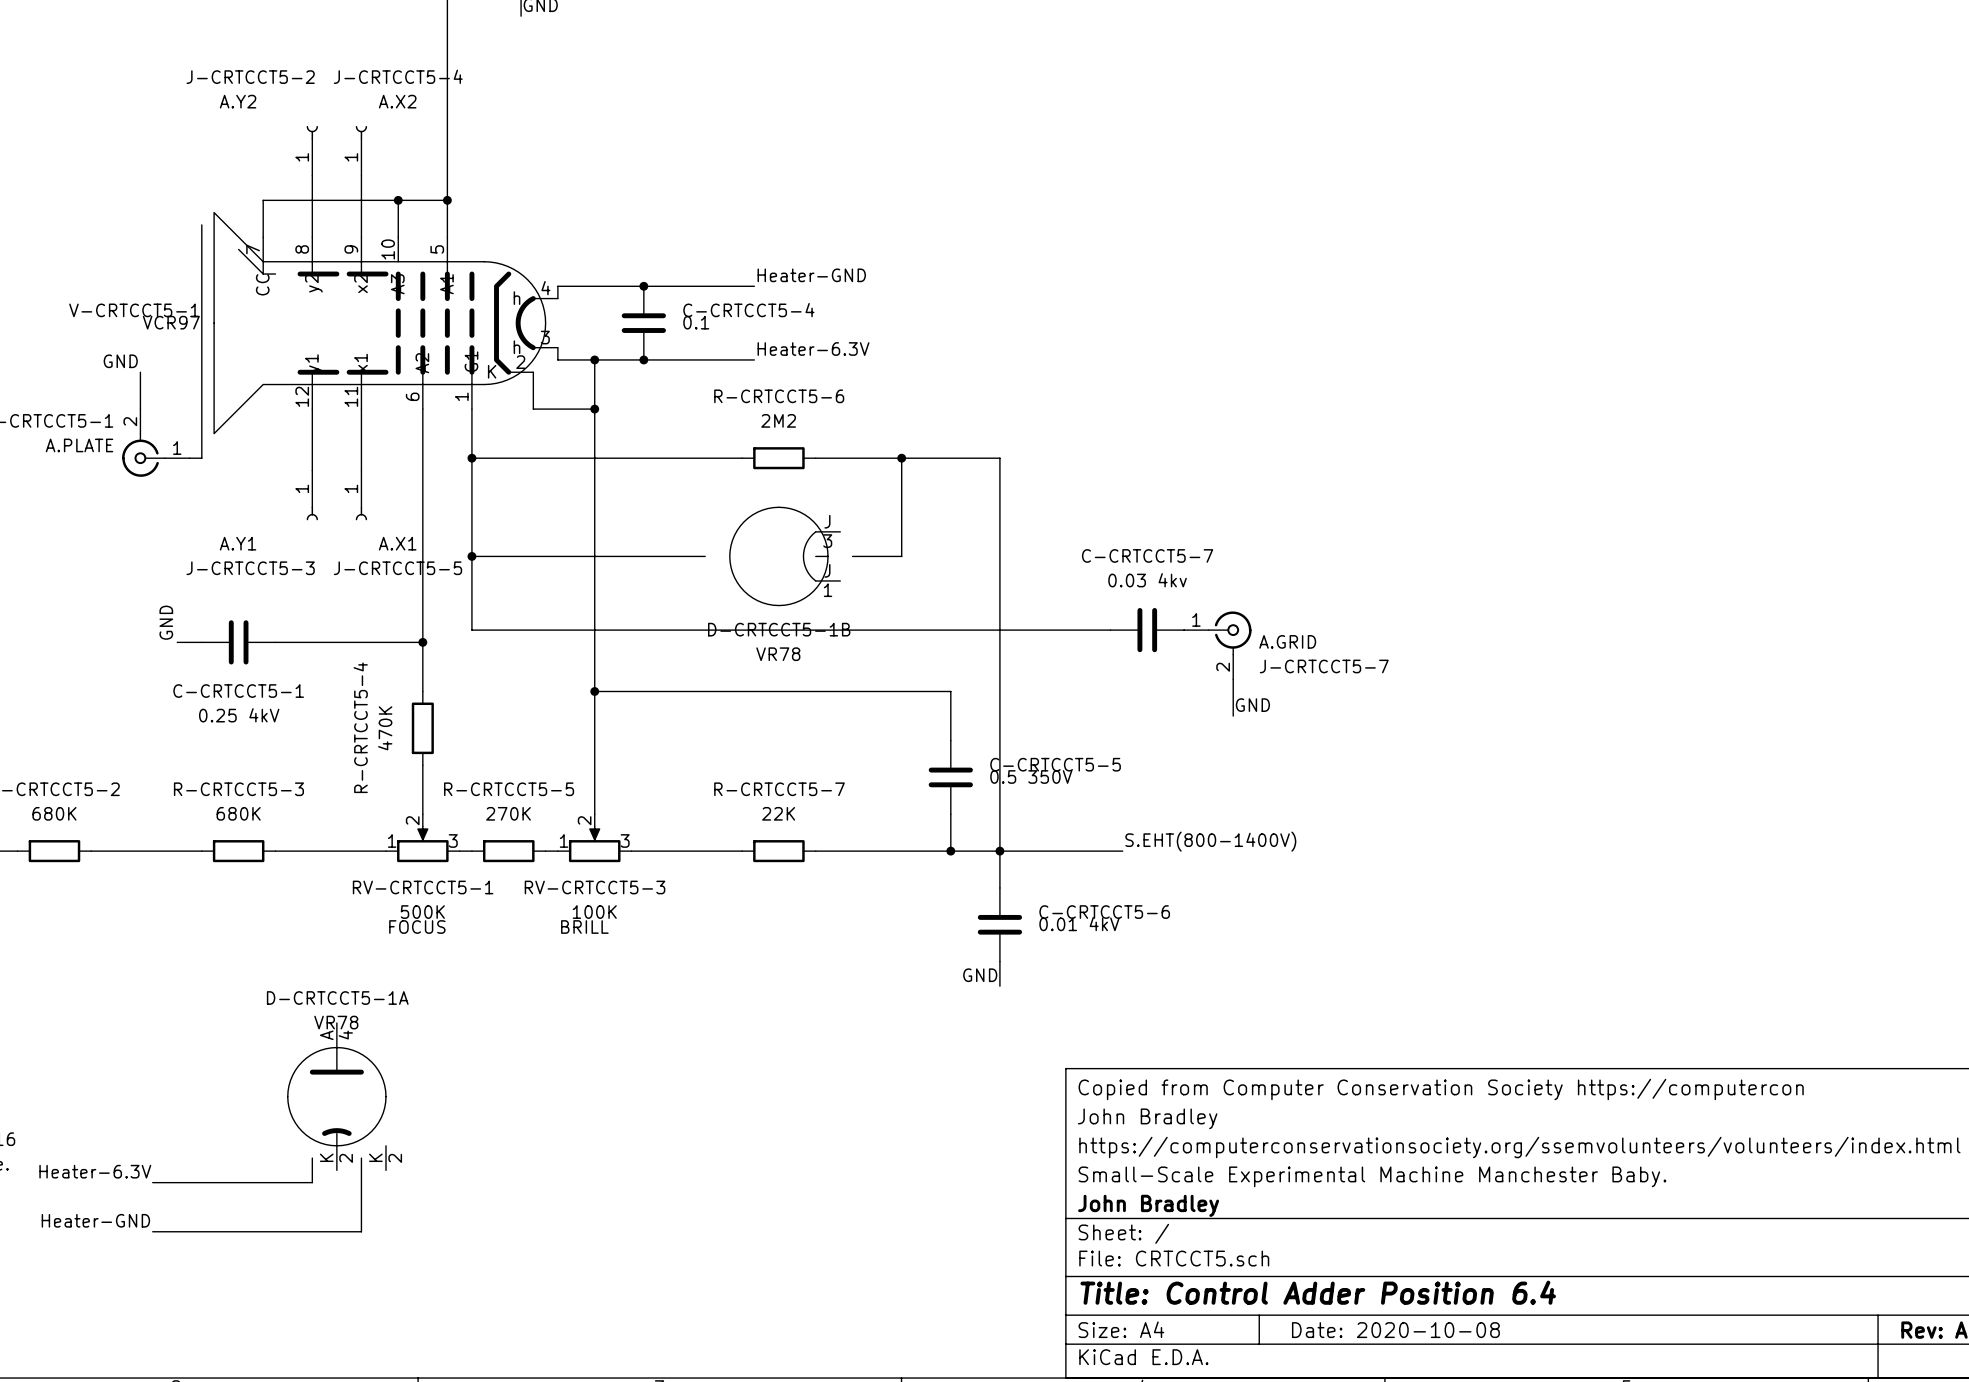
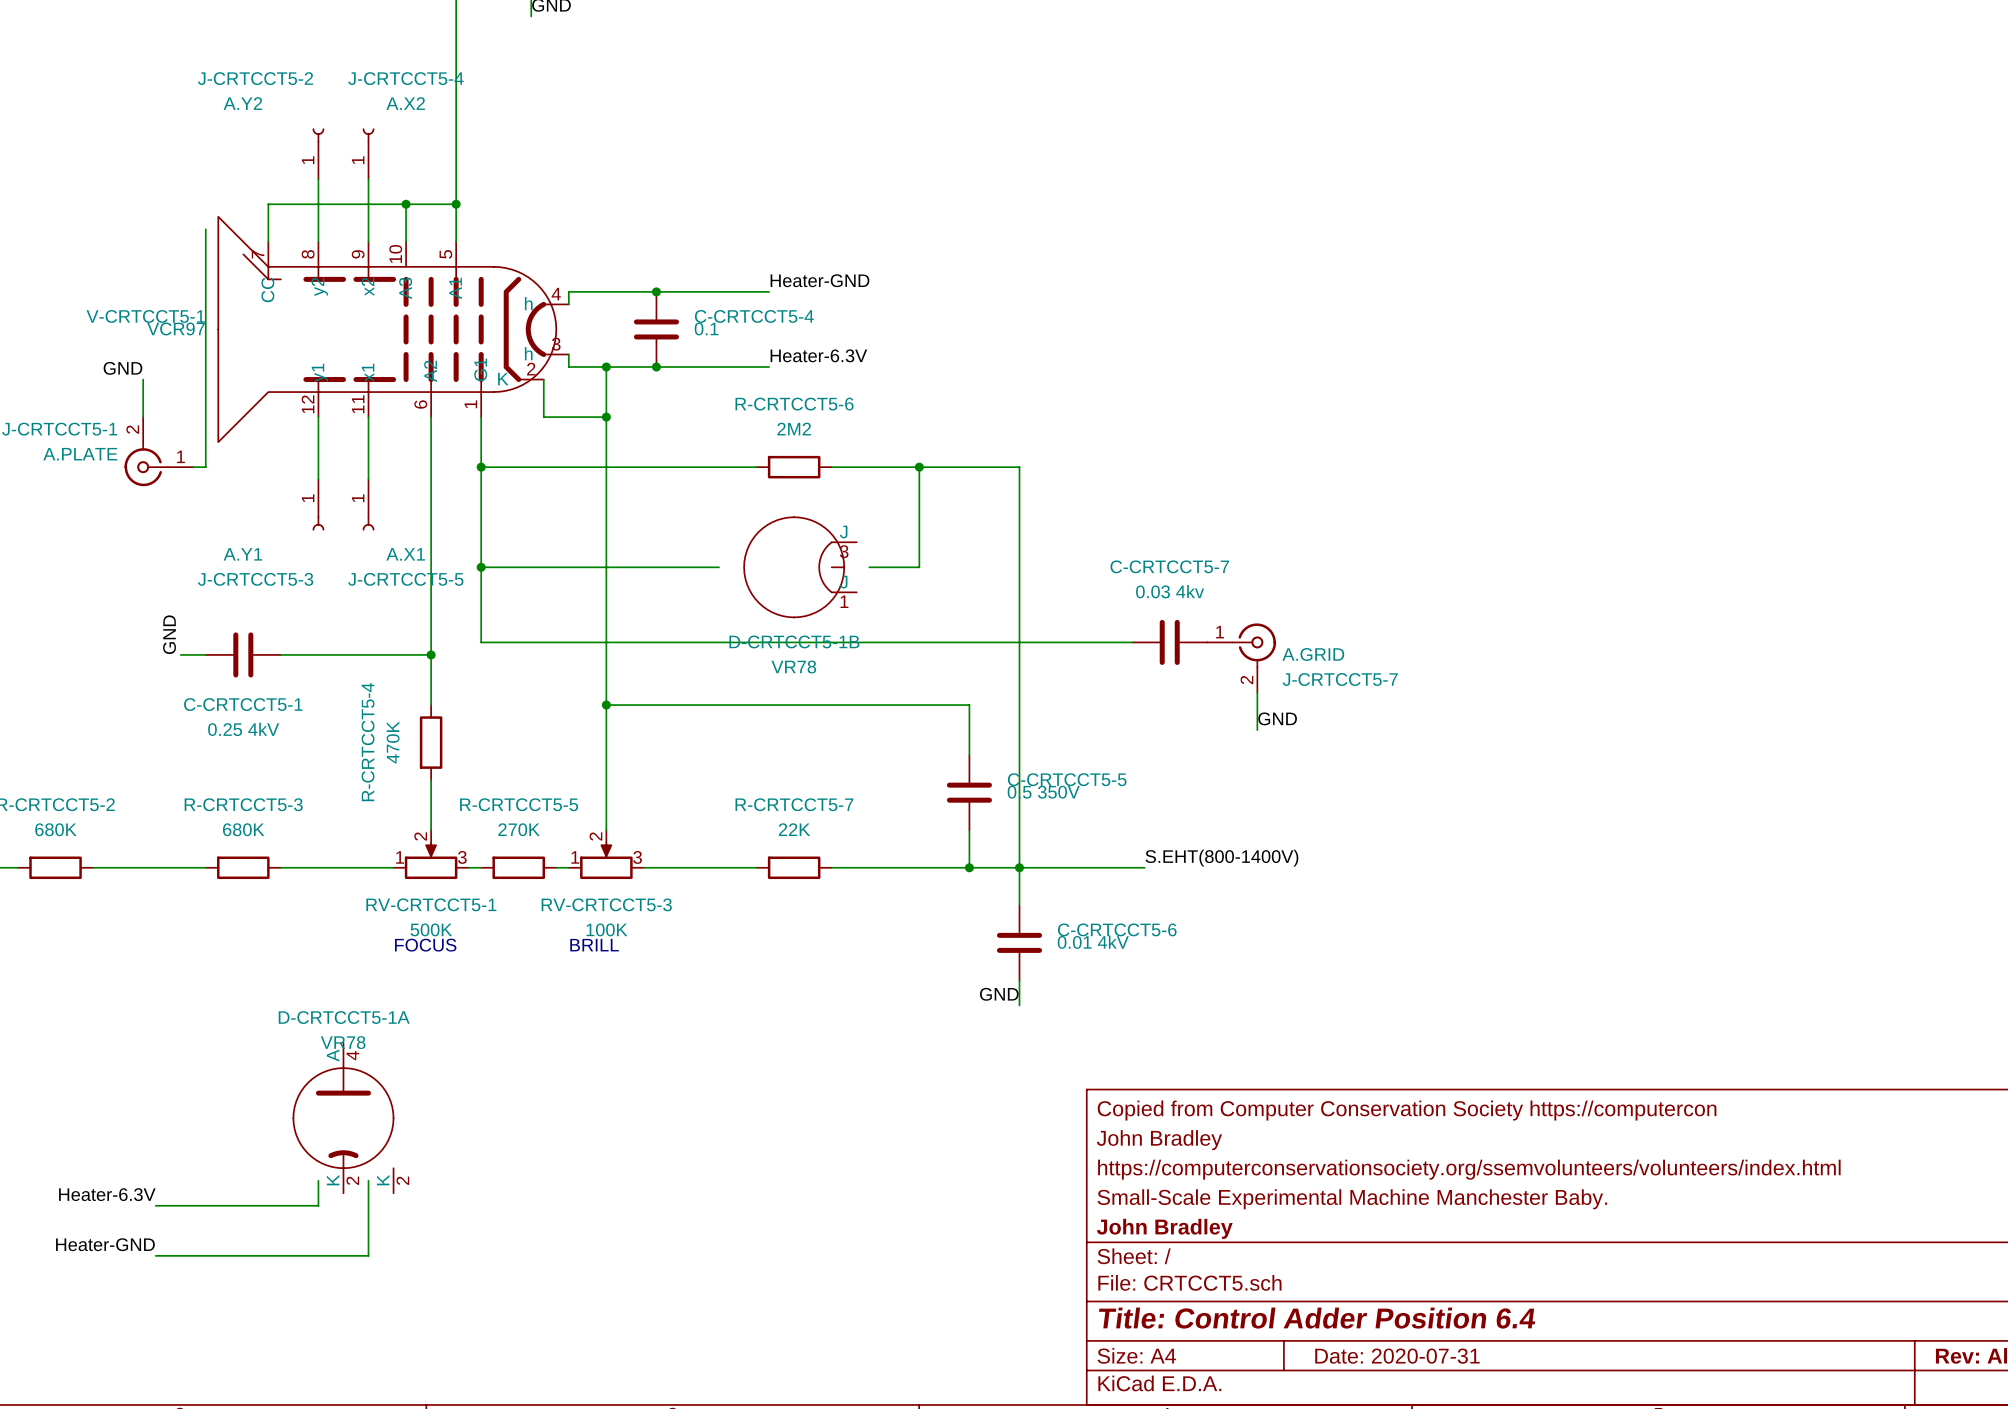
title block: Date: 2020-10-08 (1395, 1330) -> Date: 2020-07-31 (1397, 1356)

